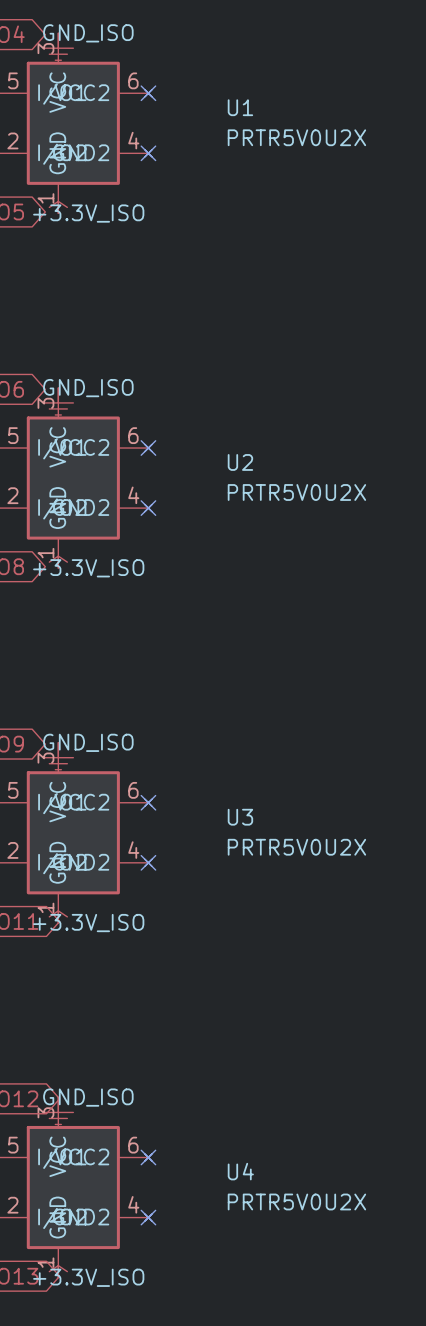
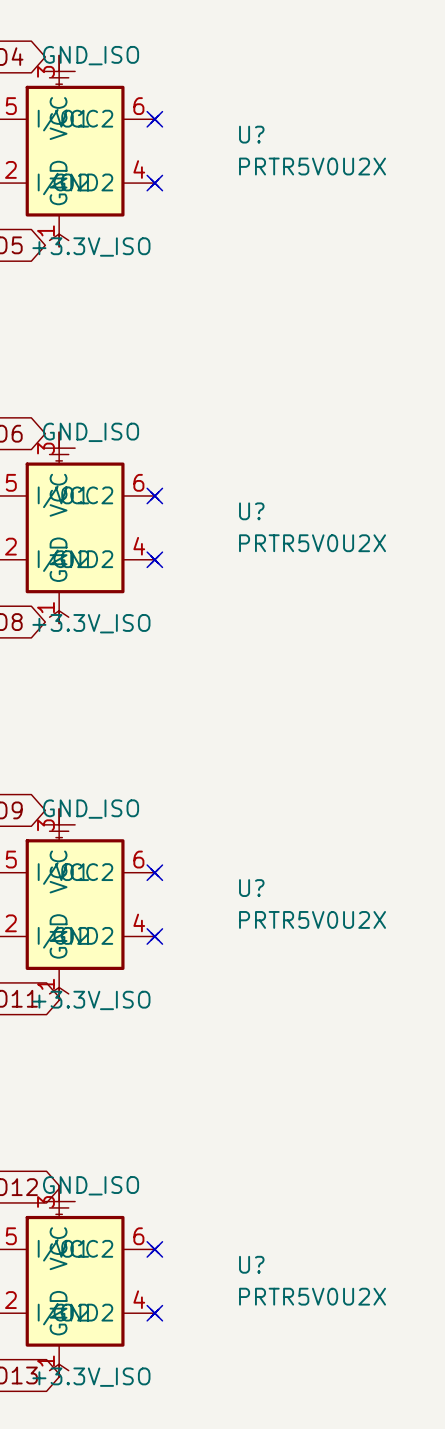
U1 name: U1 (240, 107) -> U? (251, 134)
U2 name: U2 (240, 462) -> U? (251, 511)
U3 name: U3 (240, 817) -> U? (251, 888)
U4 name: U4 (240, 1171) -> U? (251, 1264)

